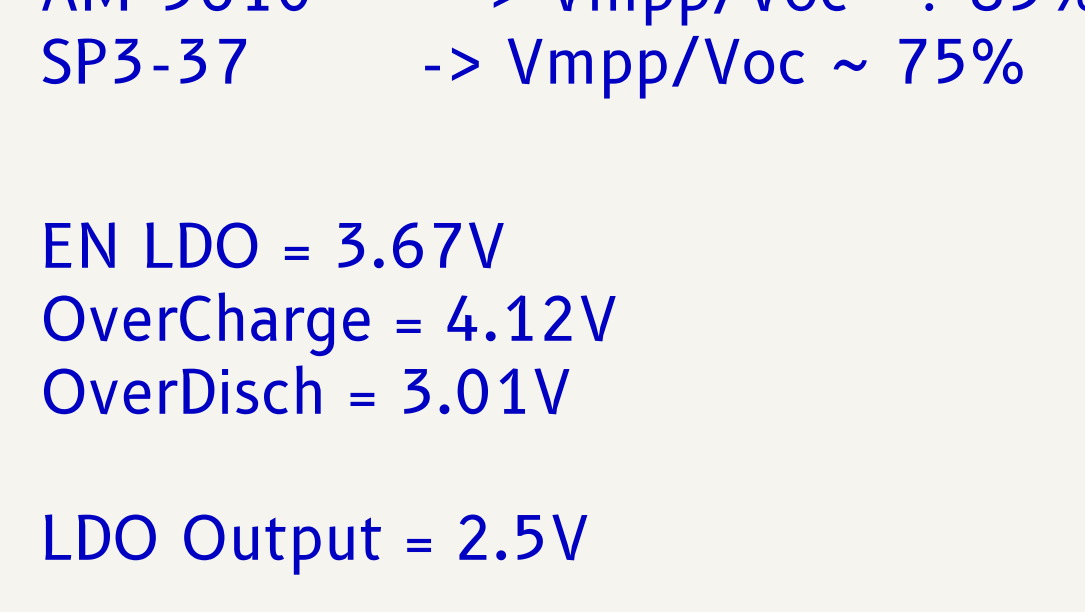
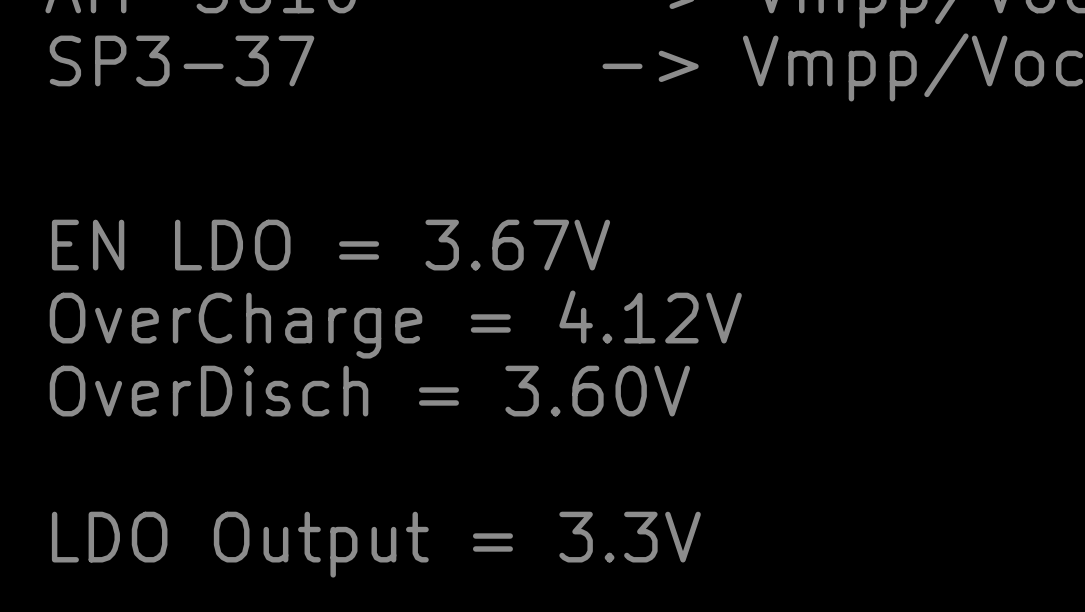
text: OverDisch = 3.01V (306, 389) -> OverDisch = 3.60V (369, 391)
text: LDO Output = 2.5V (316, 544) -> LDO Output = 3.3V (376, 544)

